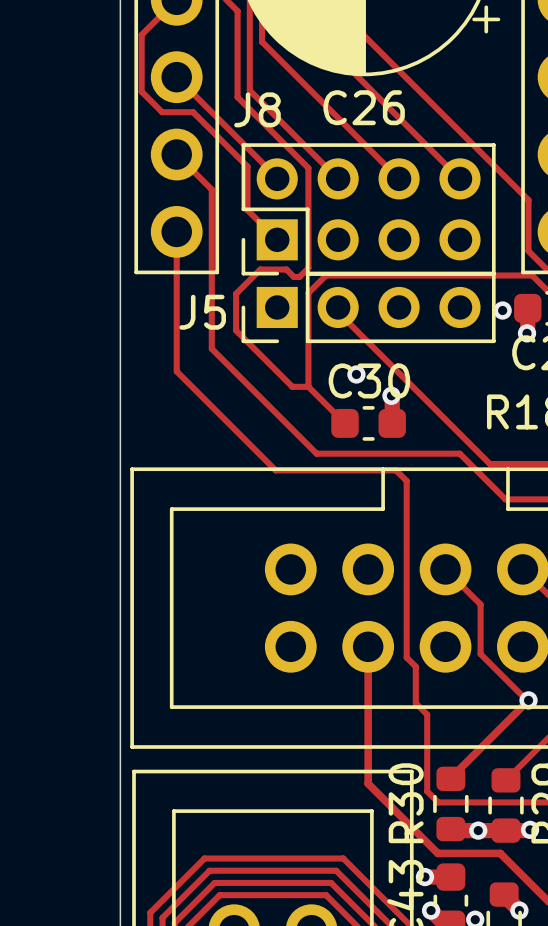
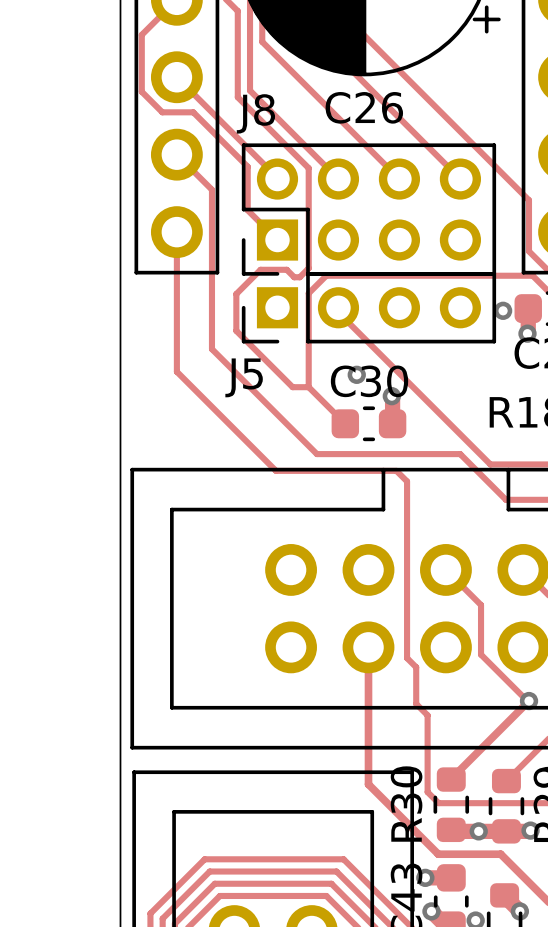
J5 name position: J5 (202, 312) -> J5 (244, 377)

